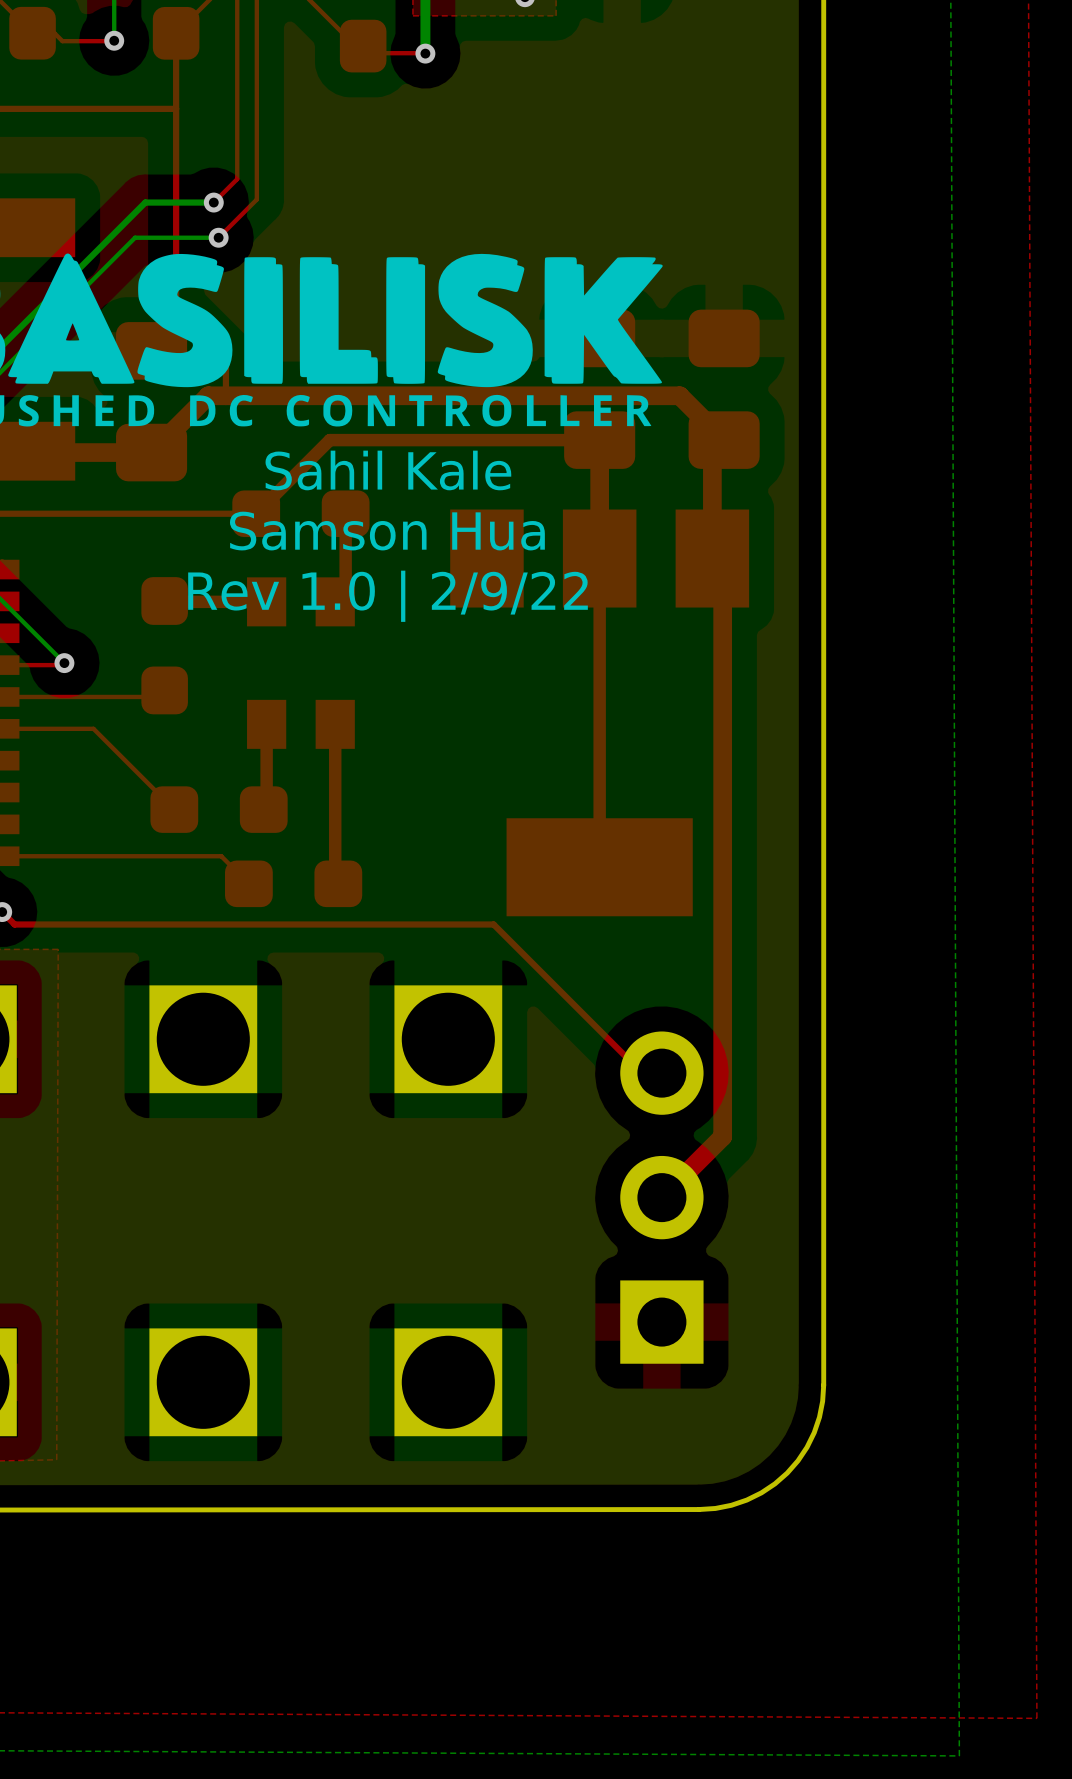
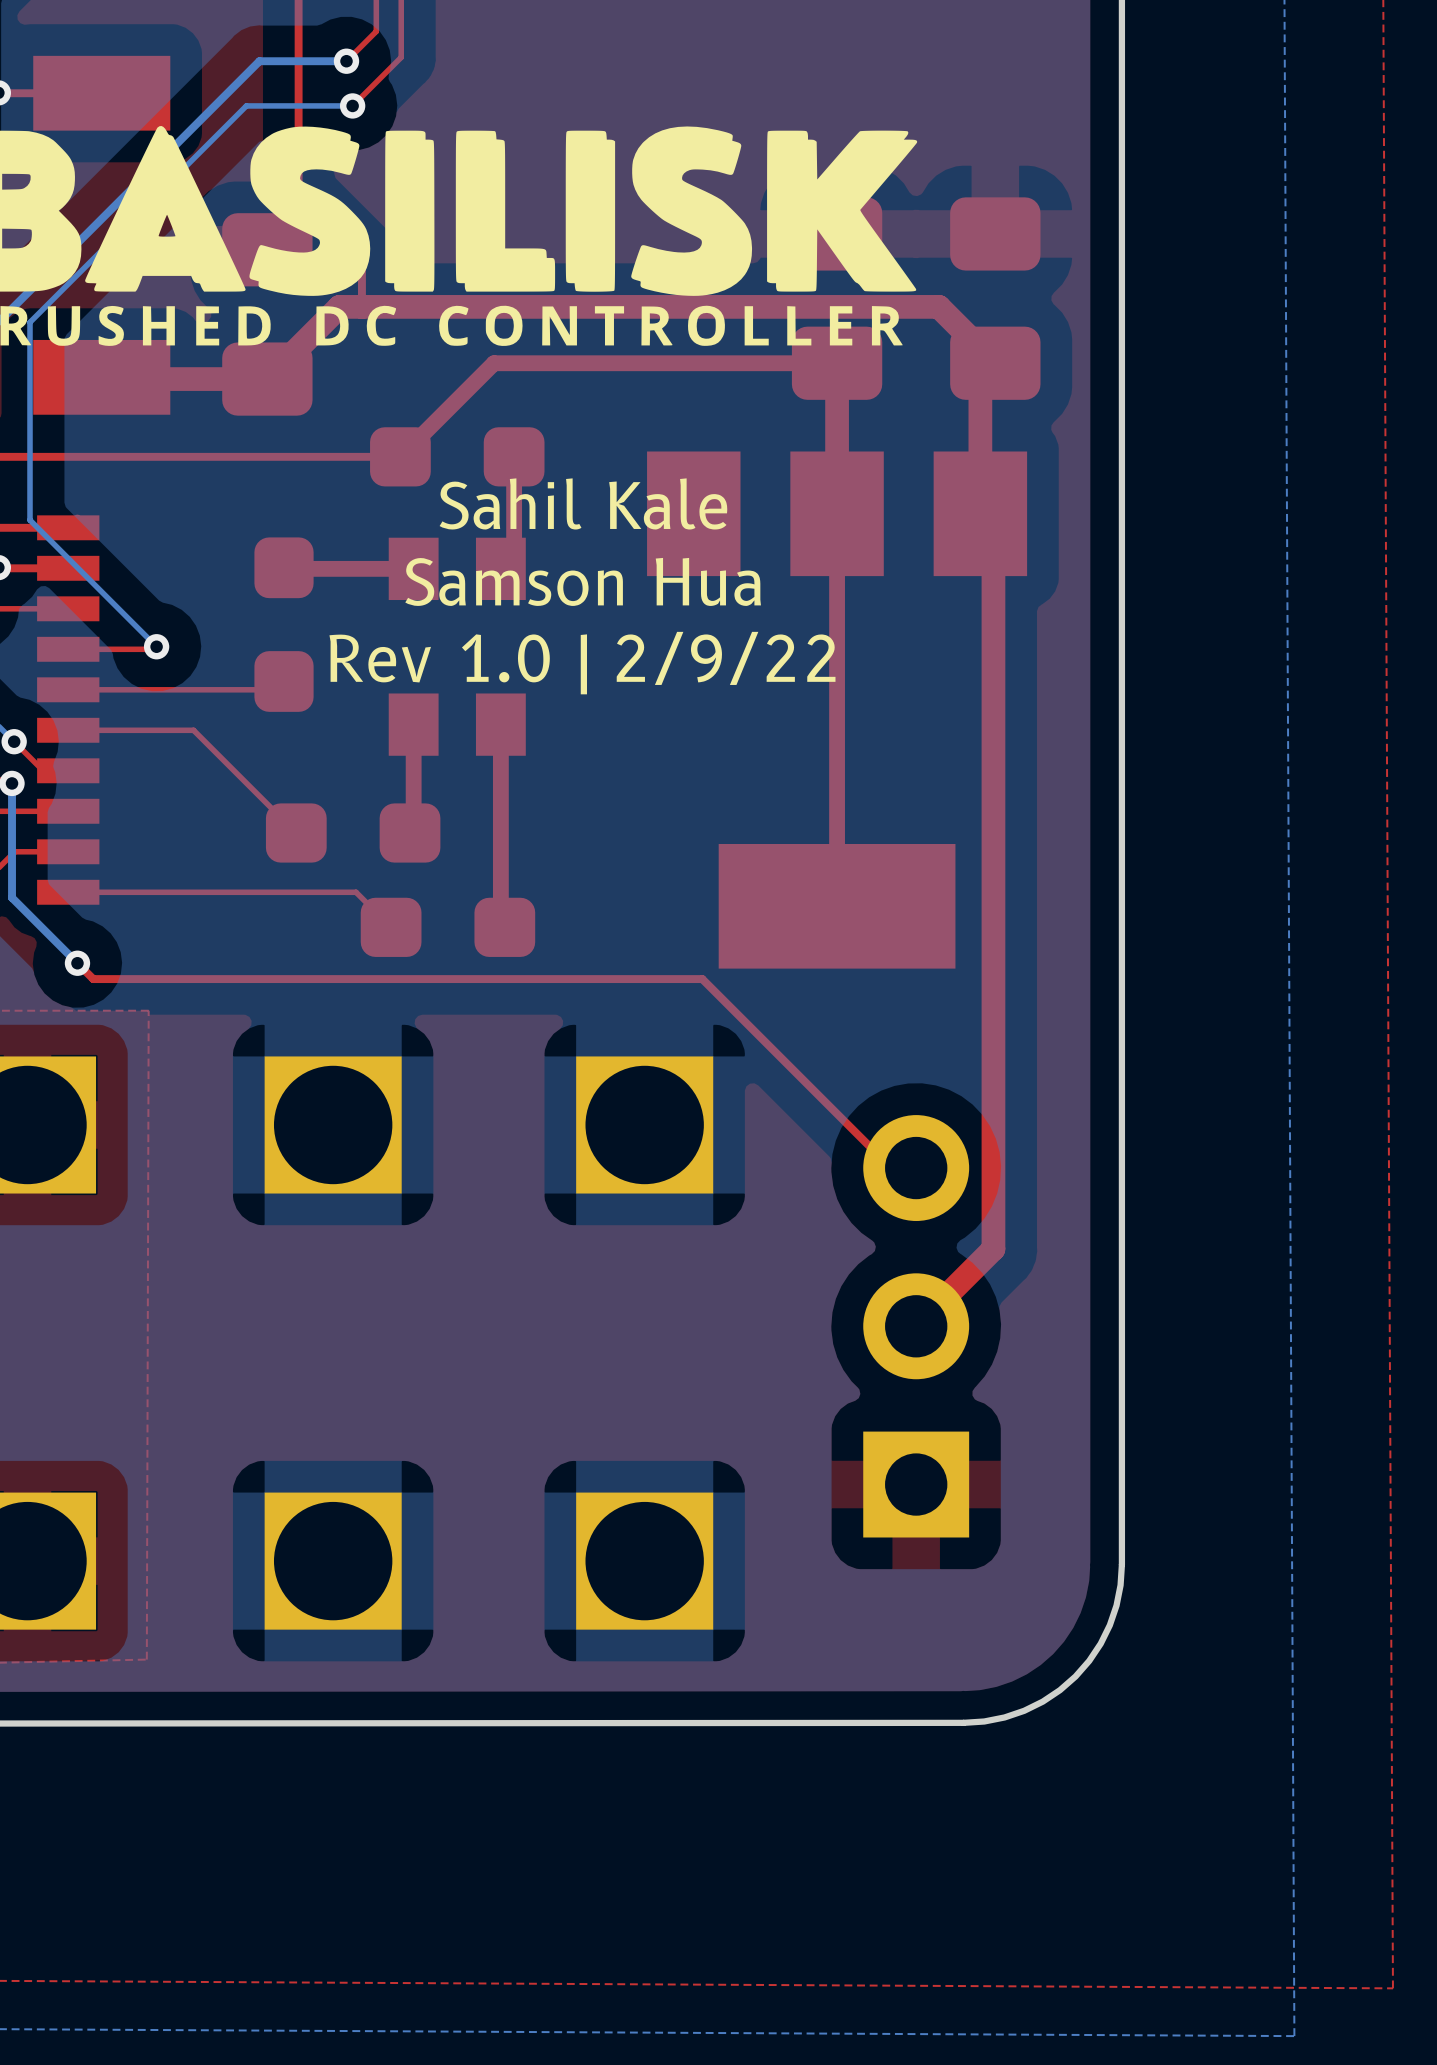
text position: Sahil Kale (388, 470) -> Sahil Kale (583, 503)
text position: Samson Hua (387, 531) -> Samson Hua (583, 581)
text position: Rev 1.0 | 2/9/22 (388, 596) -> Rev 1.0 | 2/9/22 (582, 663)

